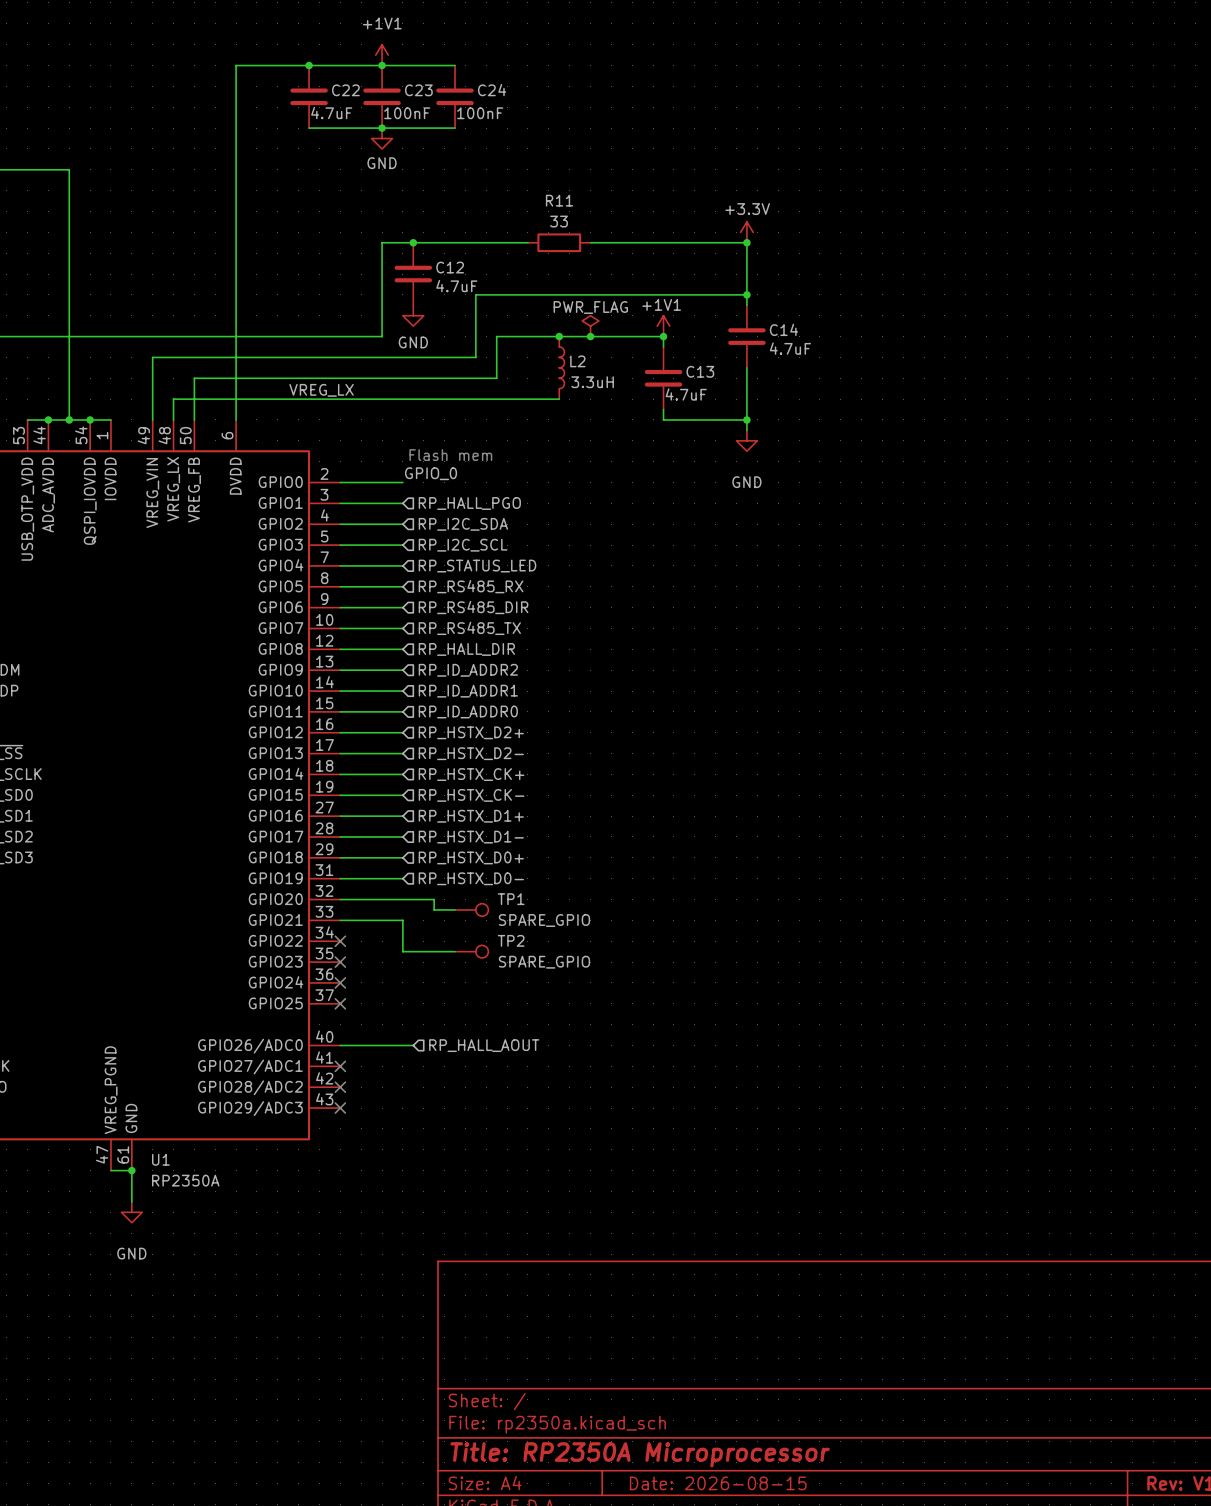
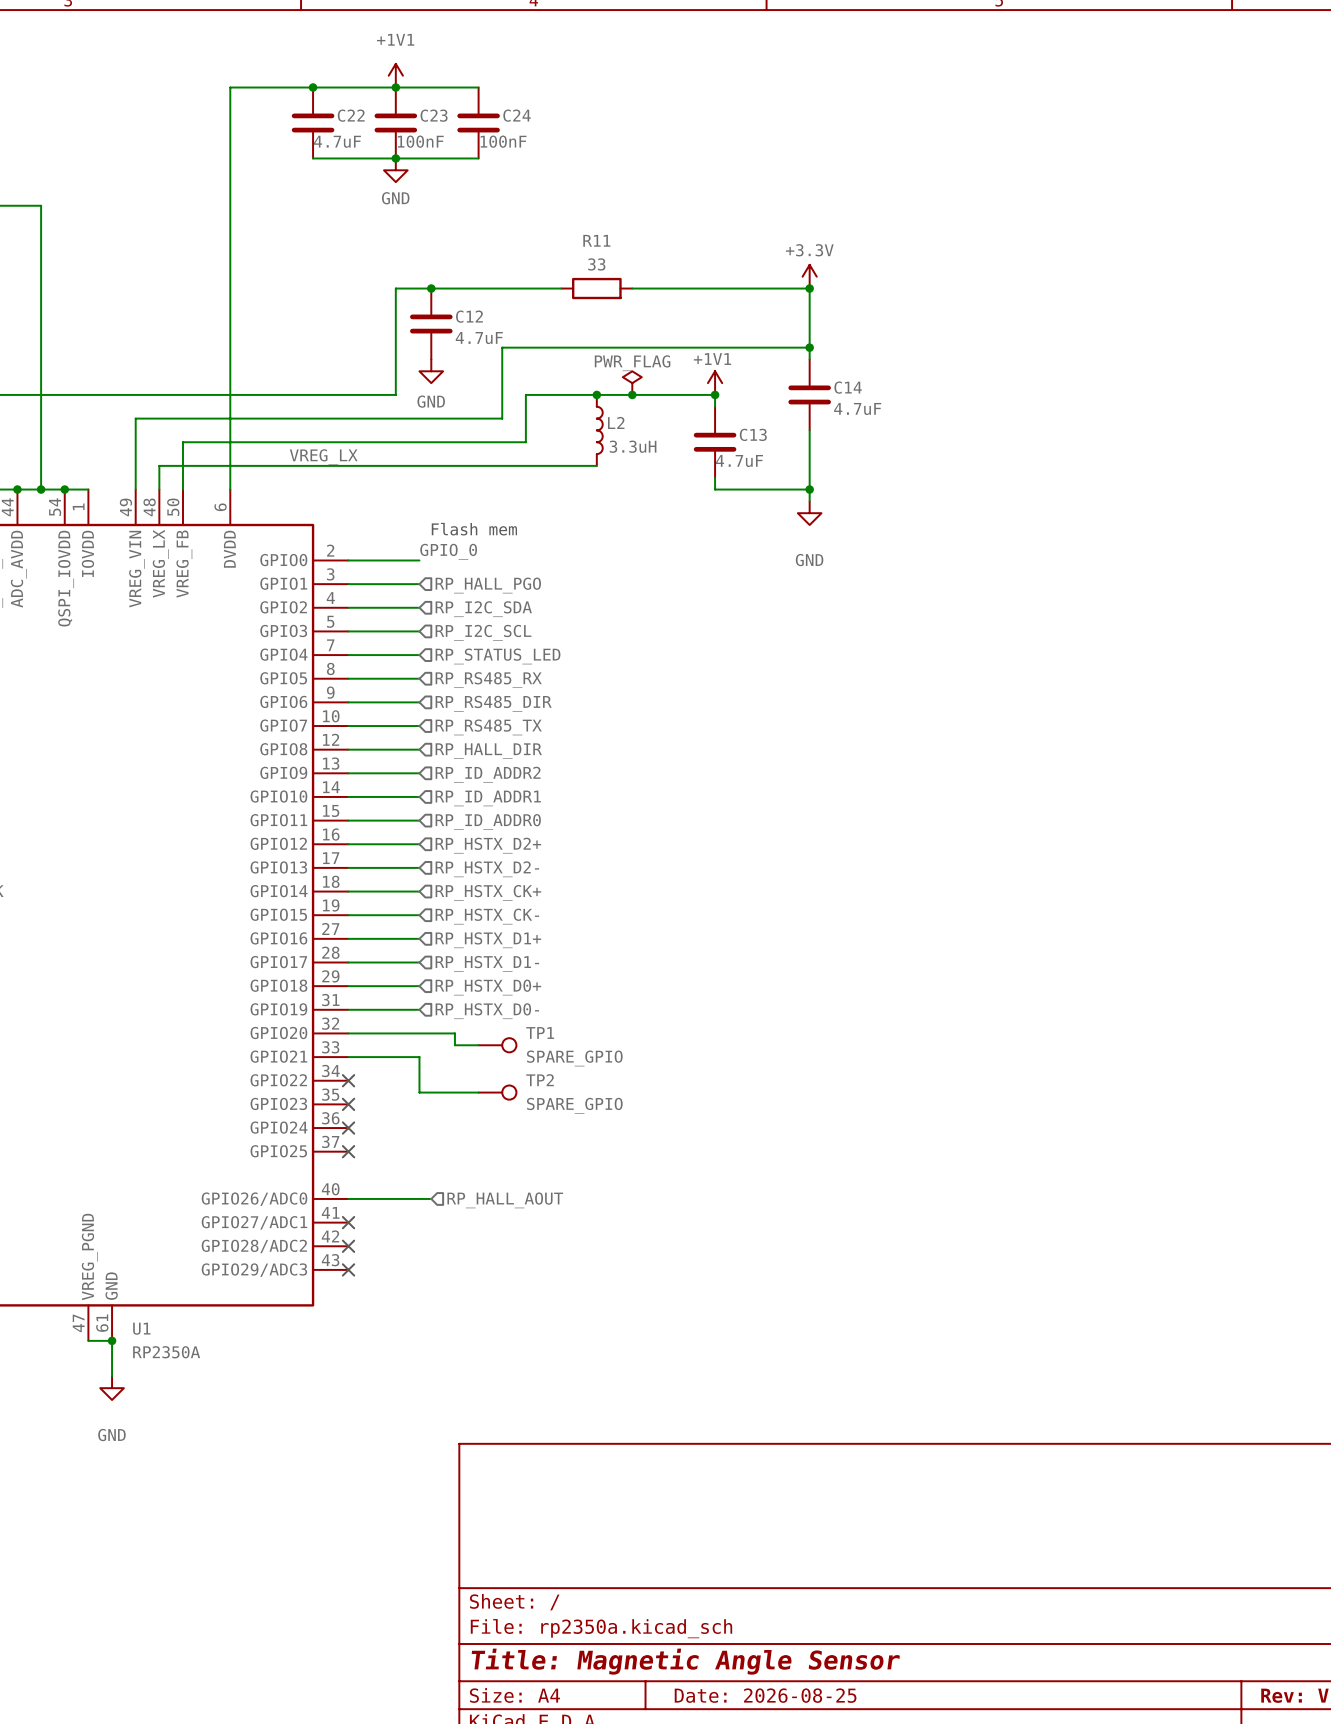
title block: Title: RP2350A Microprocessor (640, 1454) -> Title: Magnetic Angle Sensor (685, 1661)
title block: Date: 2026-08-15 (718, 1483) -> Date: 2026-08-25 (765, 1695)

